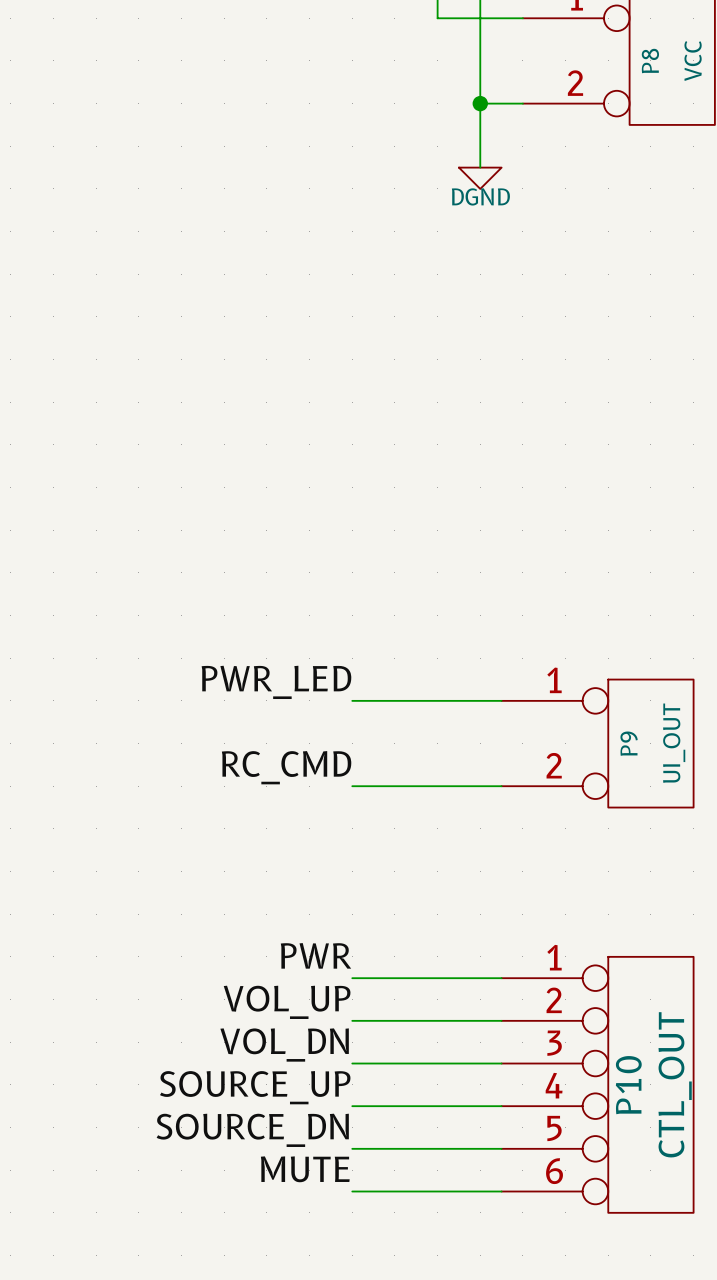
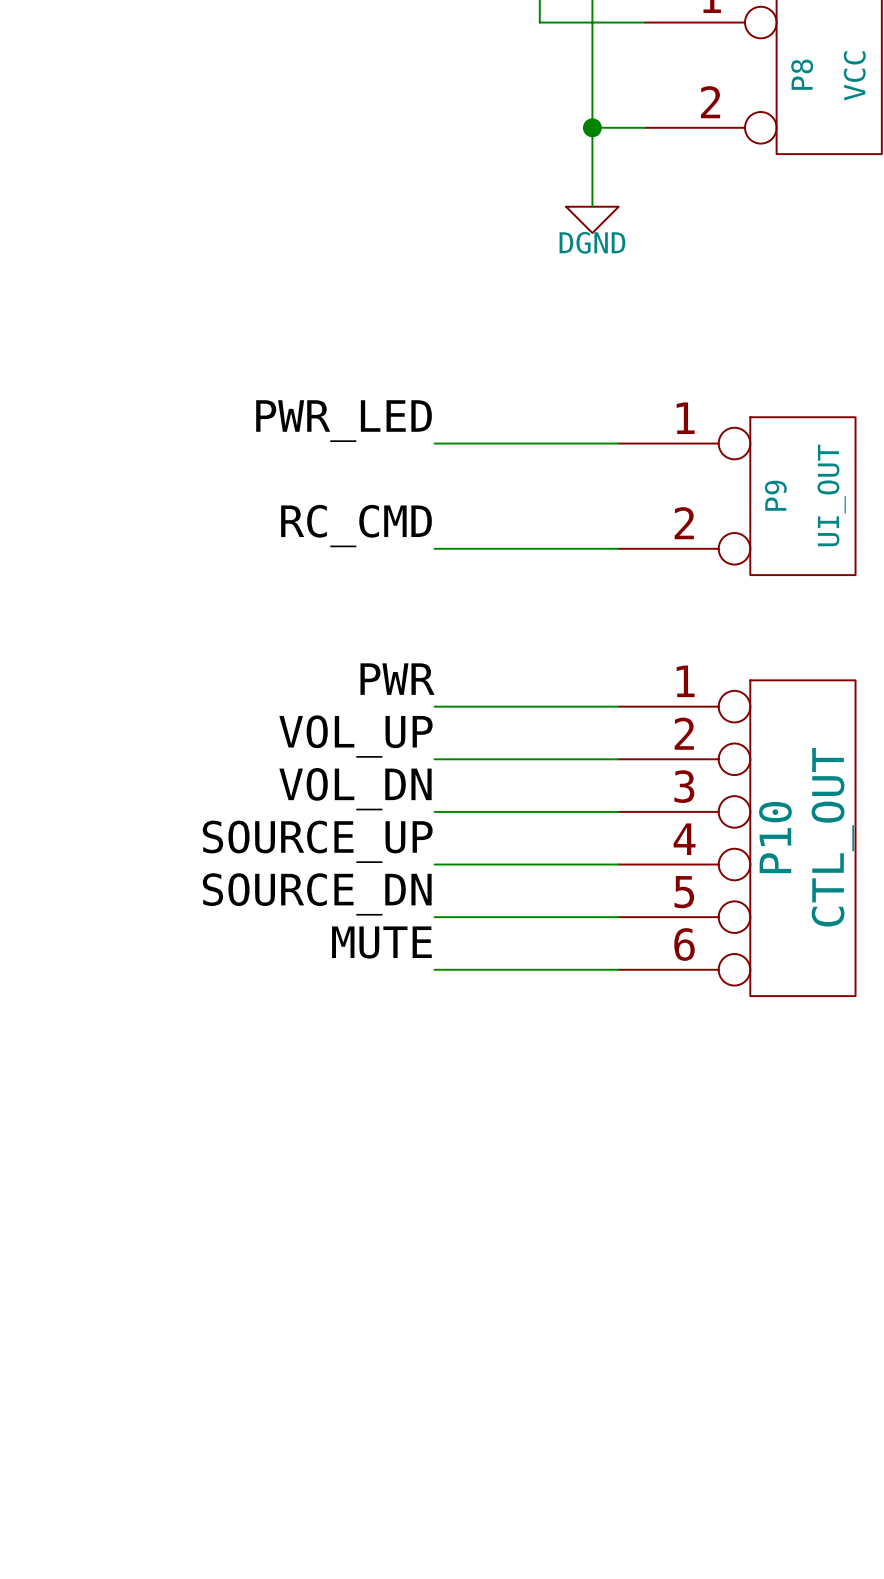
label: none -> PWR_LED (344, 421)
wire: none -> (434, 443) (618, 443)
label: none -> RC_CMD (356, 526)
wire: none -> (434, 548) (618, 548)
label: PWR_LED (276, 682) -> SOURCE_UP (317, 841)
P9 position: (597, 743) -> (737, 496)
label: RC_CMD (286, 767) -> MUTE (381, 942)
label position: PWR (315, 955) -> PWR (397, 679)
wire: (352, 978) (501, 978) -> (434, 706) (618, 706)
label position: VOL_UP (287, 1002) -> VOL_UP (355, 736)
wire: (352, 1020) (501, 1020) -> (434, 759) (618, 759)
label position: VOL_DN (284, 1045) -> VOL_DN (355, 789)
wire: (352, 1063) (501, 1063) -> (434, 811) (618, 811)
P10 position: (597, 1084) -> (737, 838)
label: SOURCE_UP (255, 1087) -> none
wire: (352, 1106) (501, 1106) -> none
label position: SOURCE_DN (252, 1130) -> SOURCE_DN (317, 894)
wire: (352, 1148) (501, 1148) -> (434, 917) (618, 917)
label: MUTE (305, 1169) -> none
wire: (352, 1191) (501, 1191) -> none

